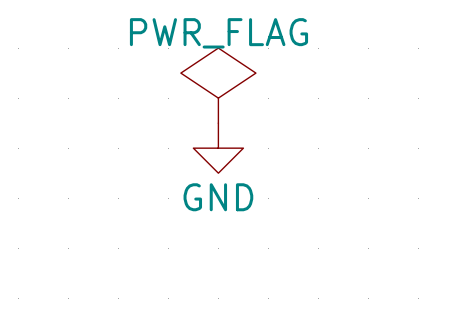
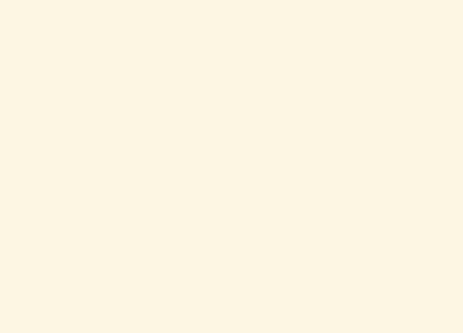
power symbol: PWR_FLAG (218, 85) -> none
power symbol: GND (218, 148) -> none

